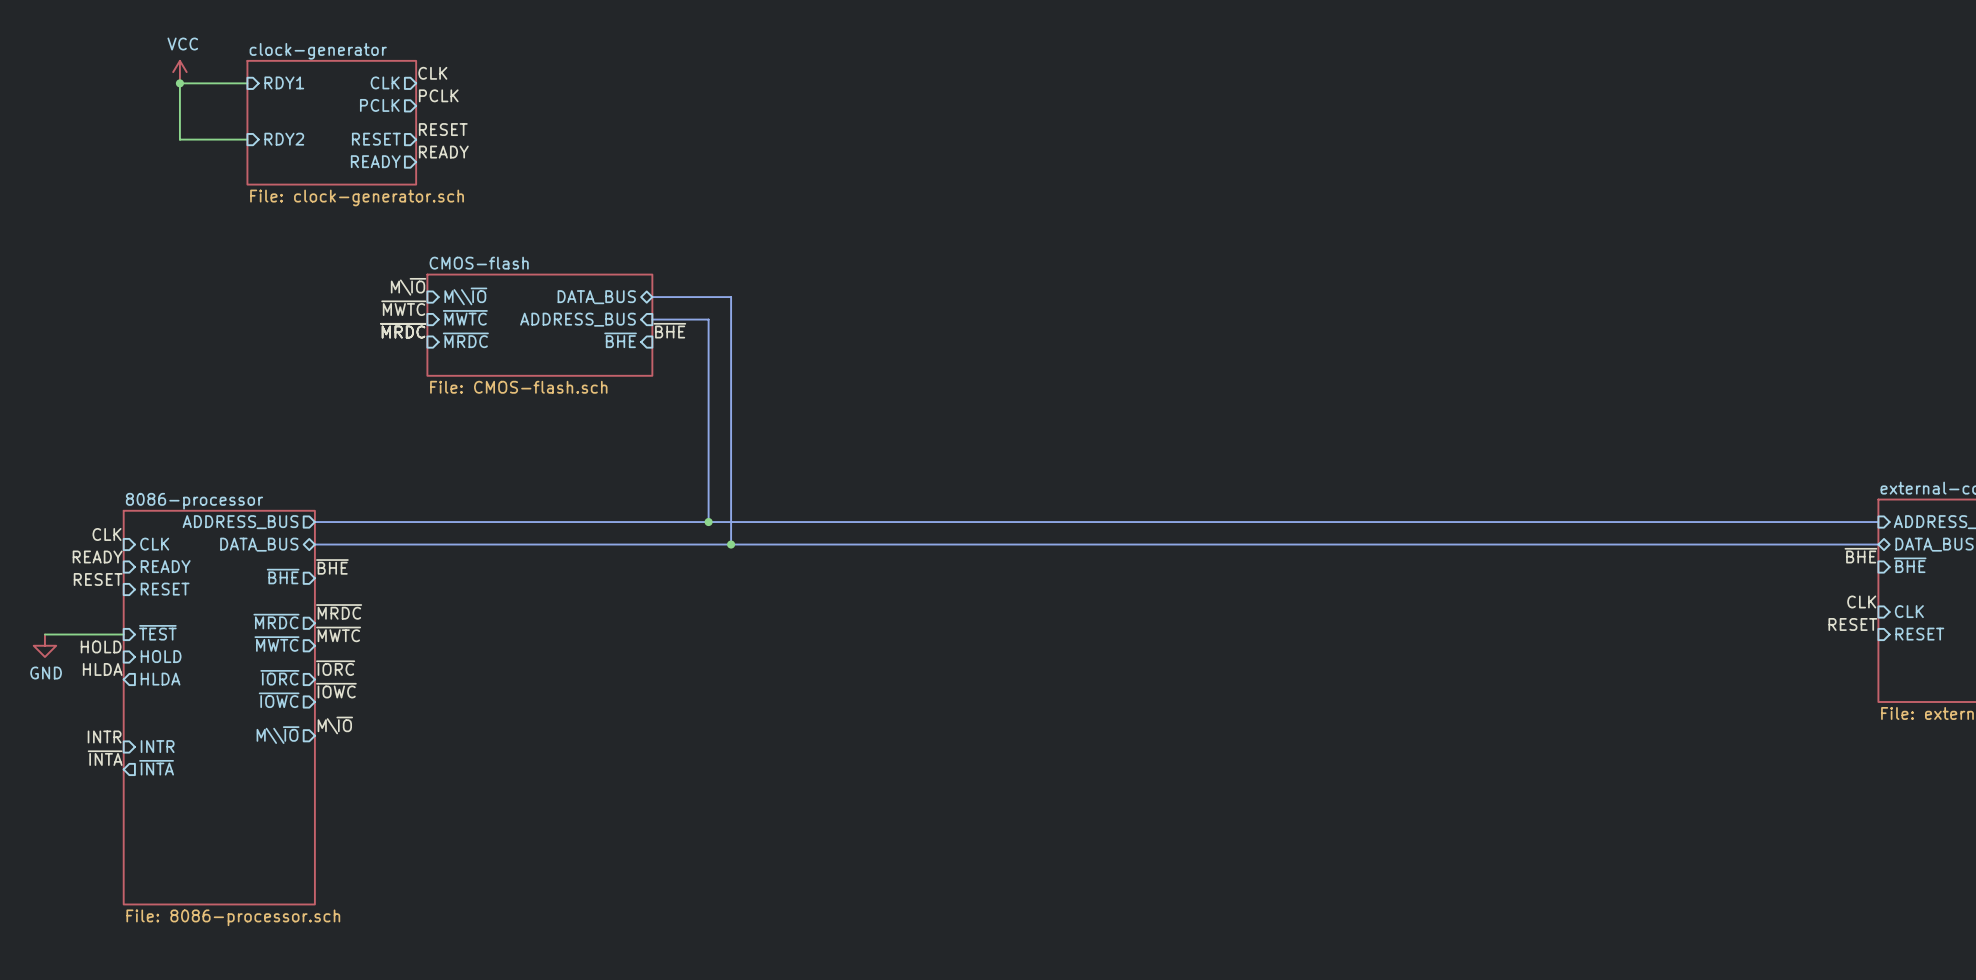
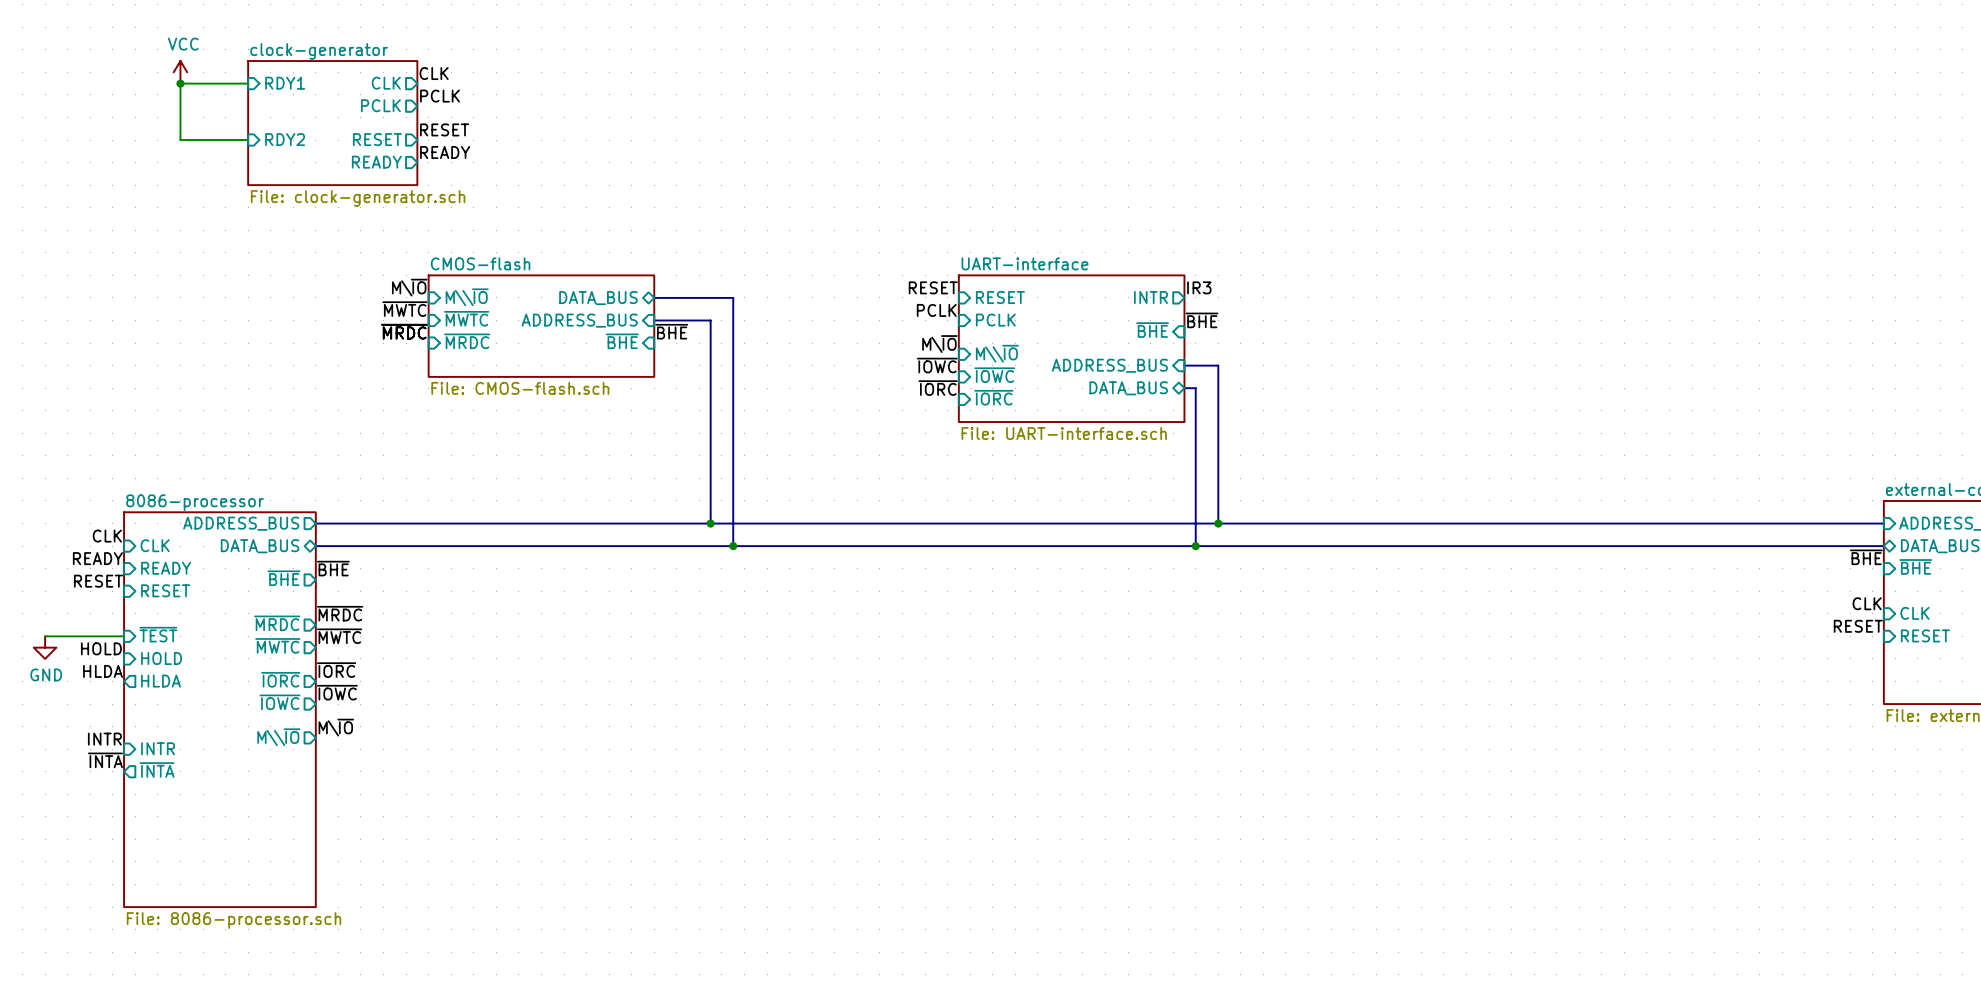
label: none -> RESET (933, 287)
label: none -> IR3 (1199, 287)
sheet pin: none -> RESET (1000, 297)
sheet pin: none -> INTR (1150, 297)
label: none -> PCLK (936, 310)
sheet pin: none -> PCLK (995, 320)
label: none -> ~{BHE} (1202, 320)
sheet pin: none -> ~{BHE} (1152, 330)
label: none -> M\~{IO} (939, 344)
sheet UART-interface: none -> File: UART-interface.sch (1071, 348)
sheet pin: none -> M\\~{IO} (997, 353)
label: none -> ~{IOWC} (937, 365)
sheet pin: none -> ADDRESS_BUS (1109, 365)
bus: none -> (1184, 365) (1218, 365) (1218, 523)
sheet pin: none -> ~{IOWC} (994, 375)
label: none -> ~{IORC} (938, 388)
sheet pin: none -> DATA_BUS (1128, 388)
bus: none -> (1184, 388) (1195, 388) (1195, 546)
sheet pin: none -> ~{IORC} (993, 397)
junction: none -> (1218, 523)
junction: none -> (1195, 546)

